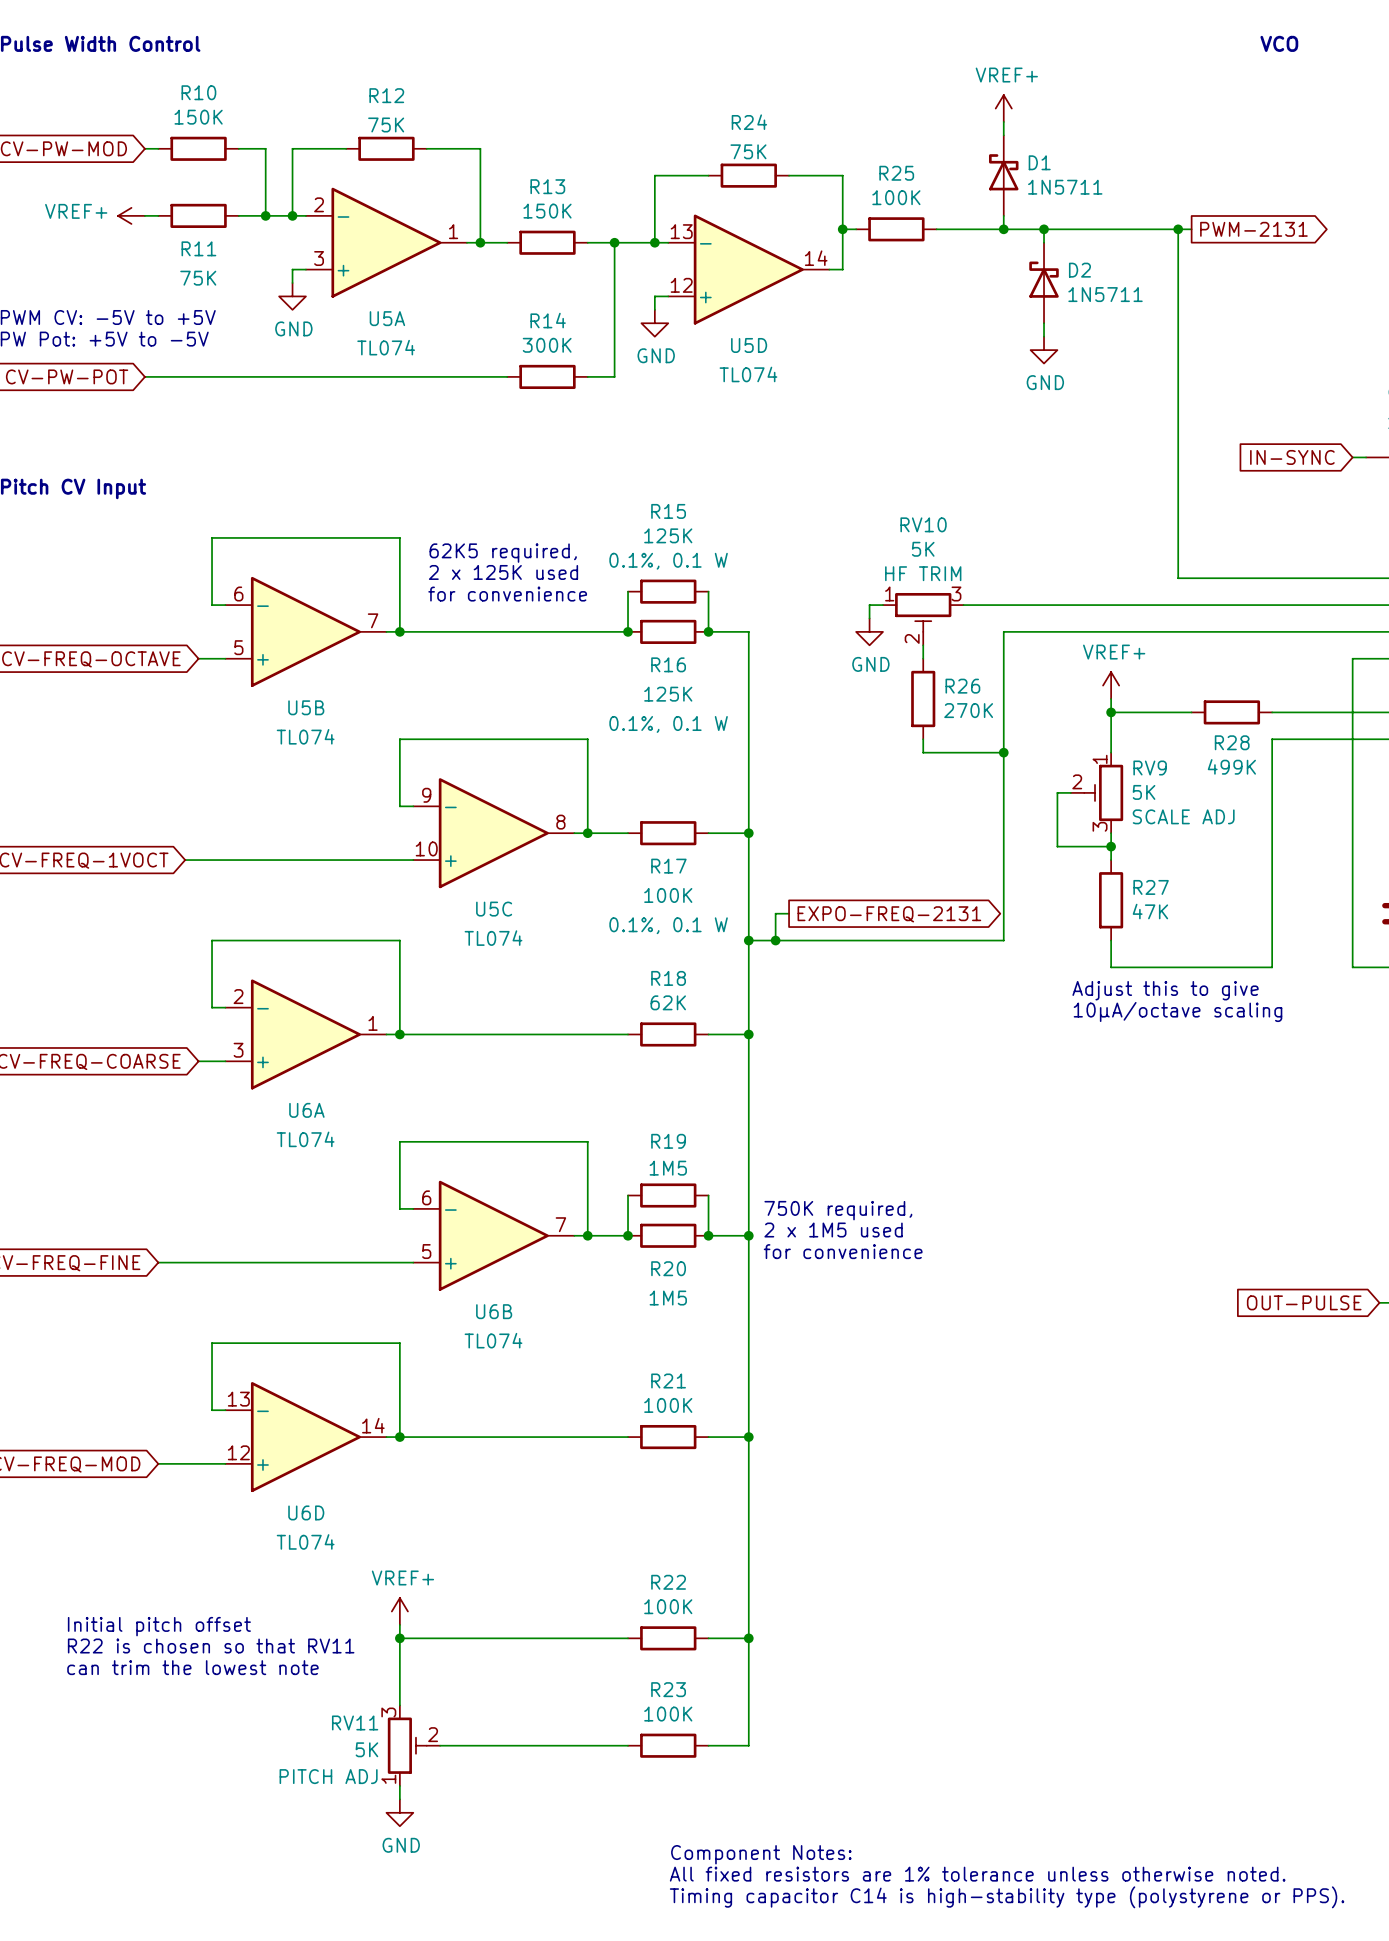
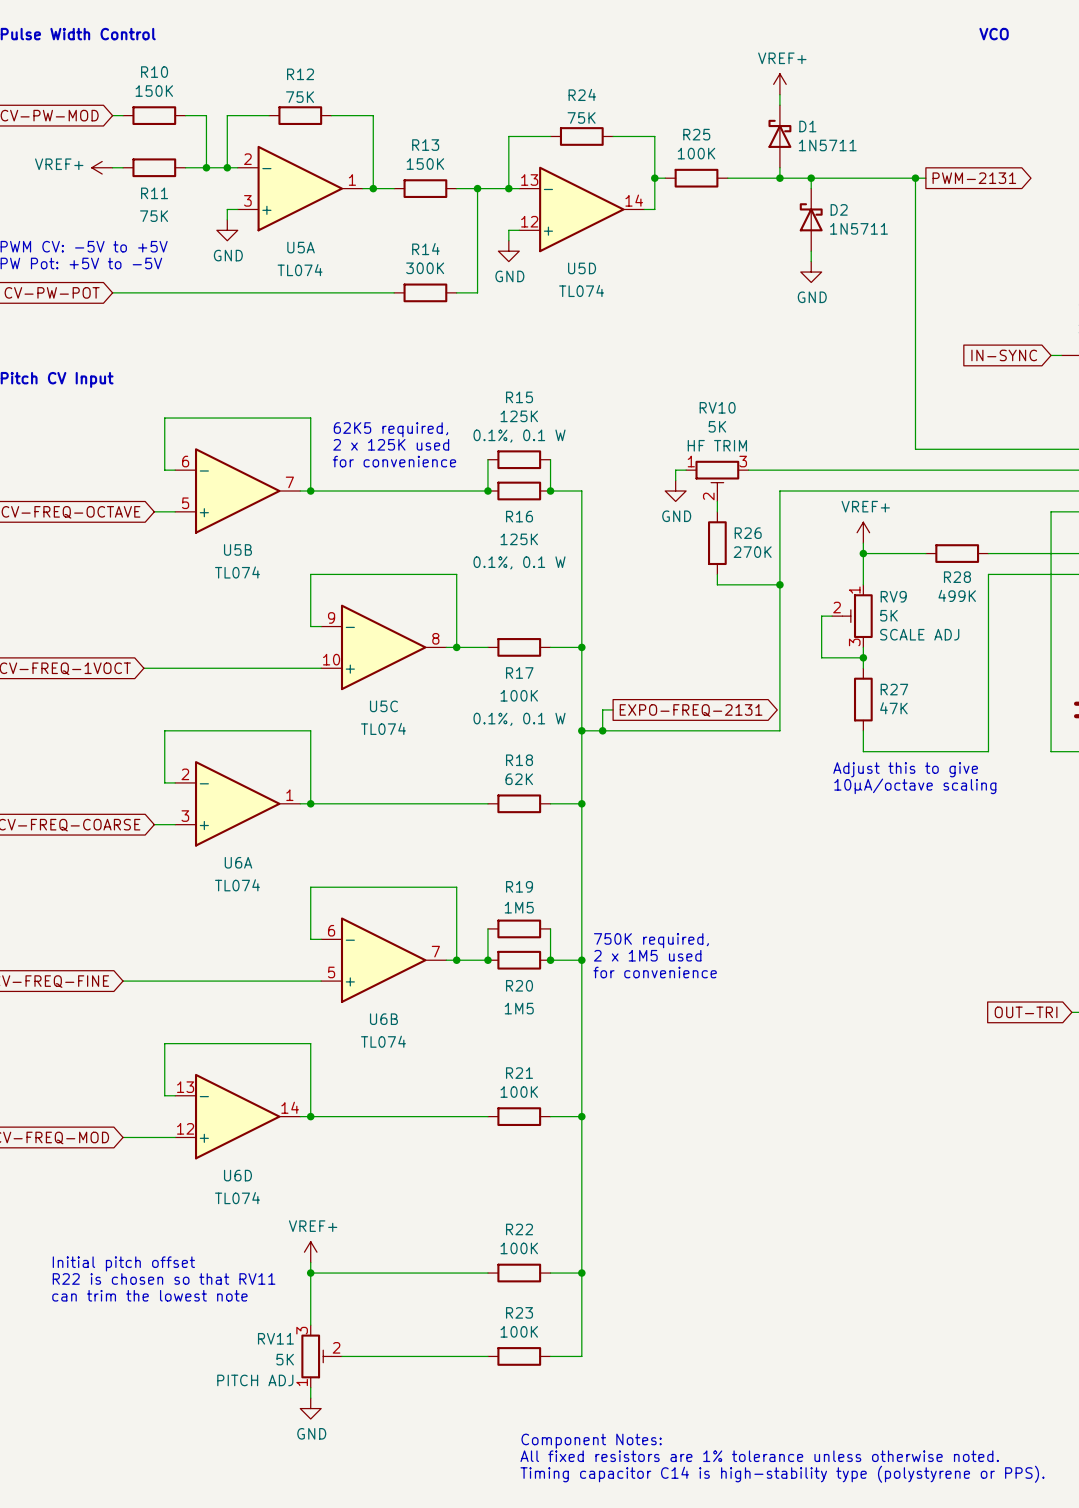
global label: OUT-PULSE (1304, 1302) -> OUT-TRI (1026, 1012)

